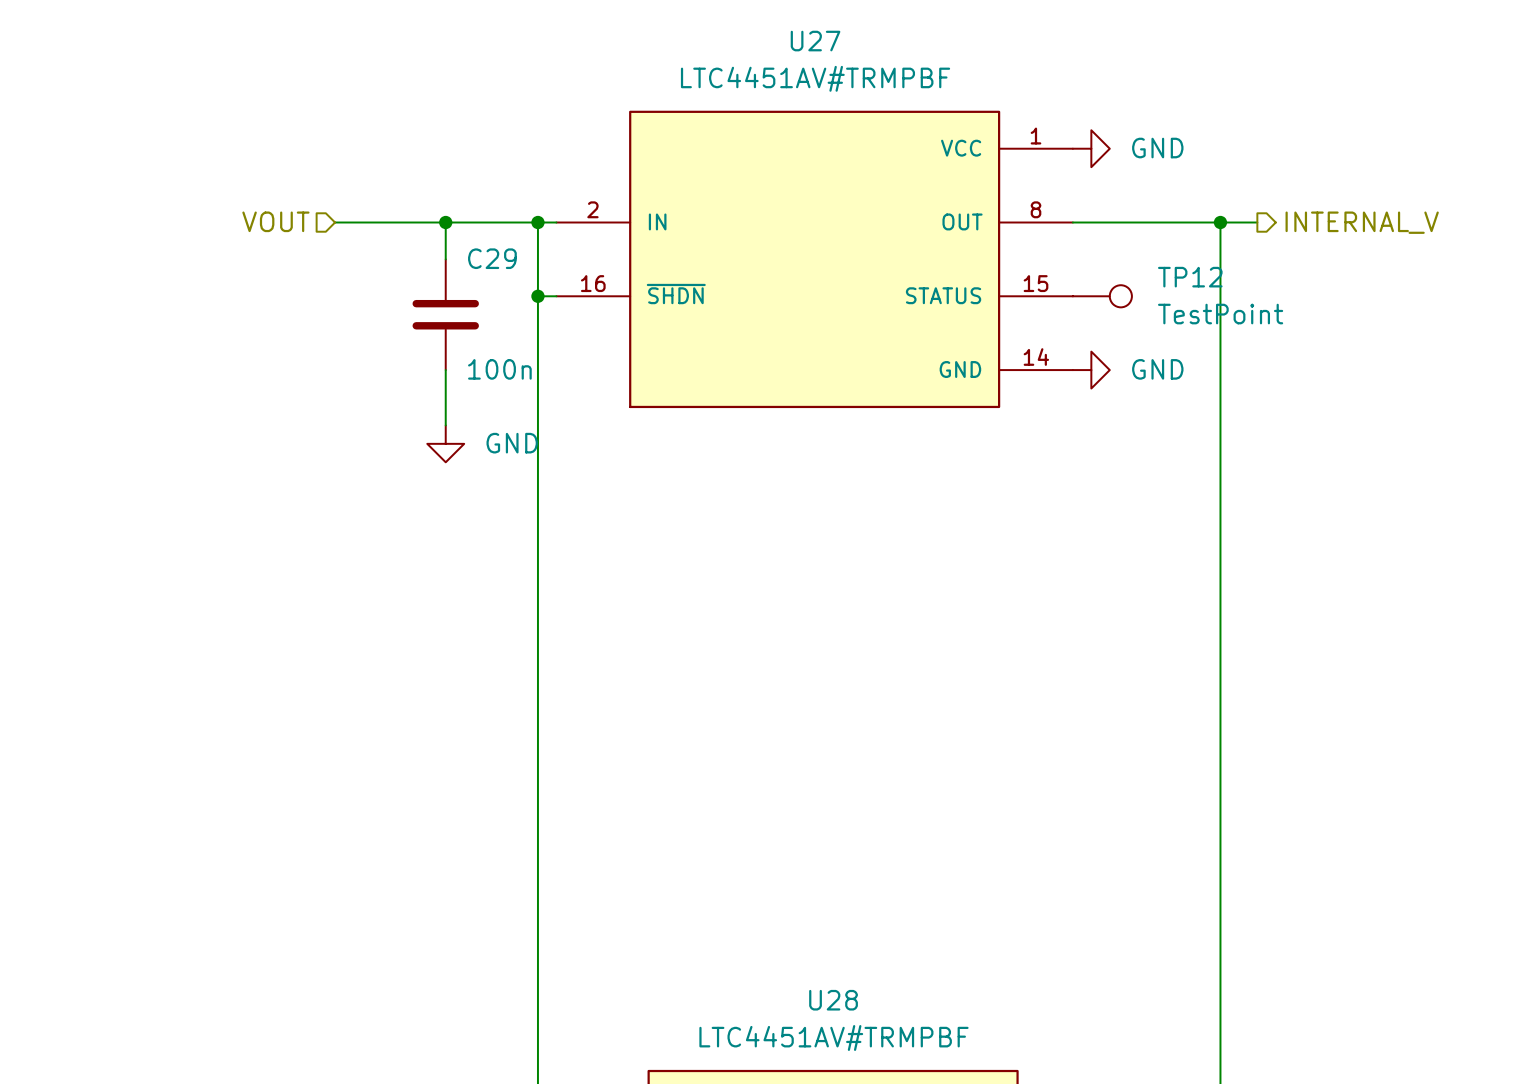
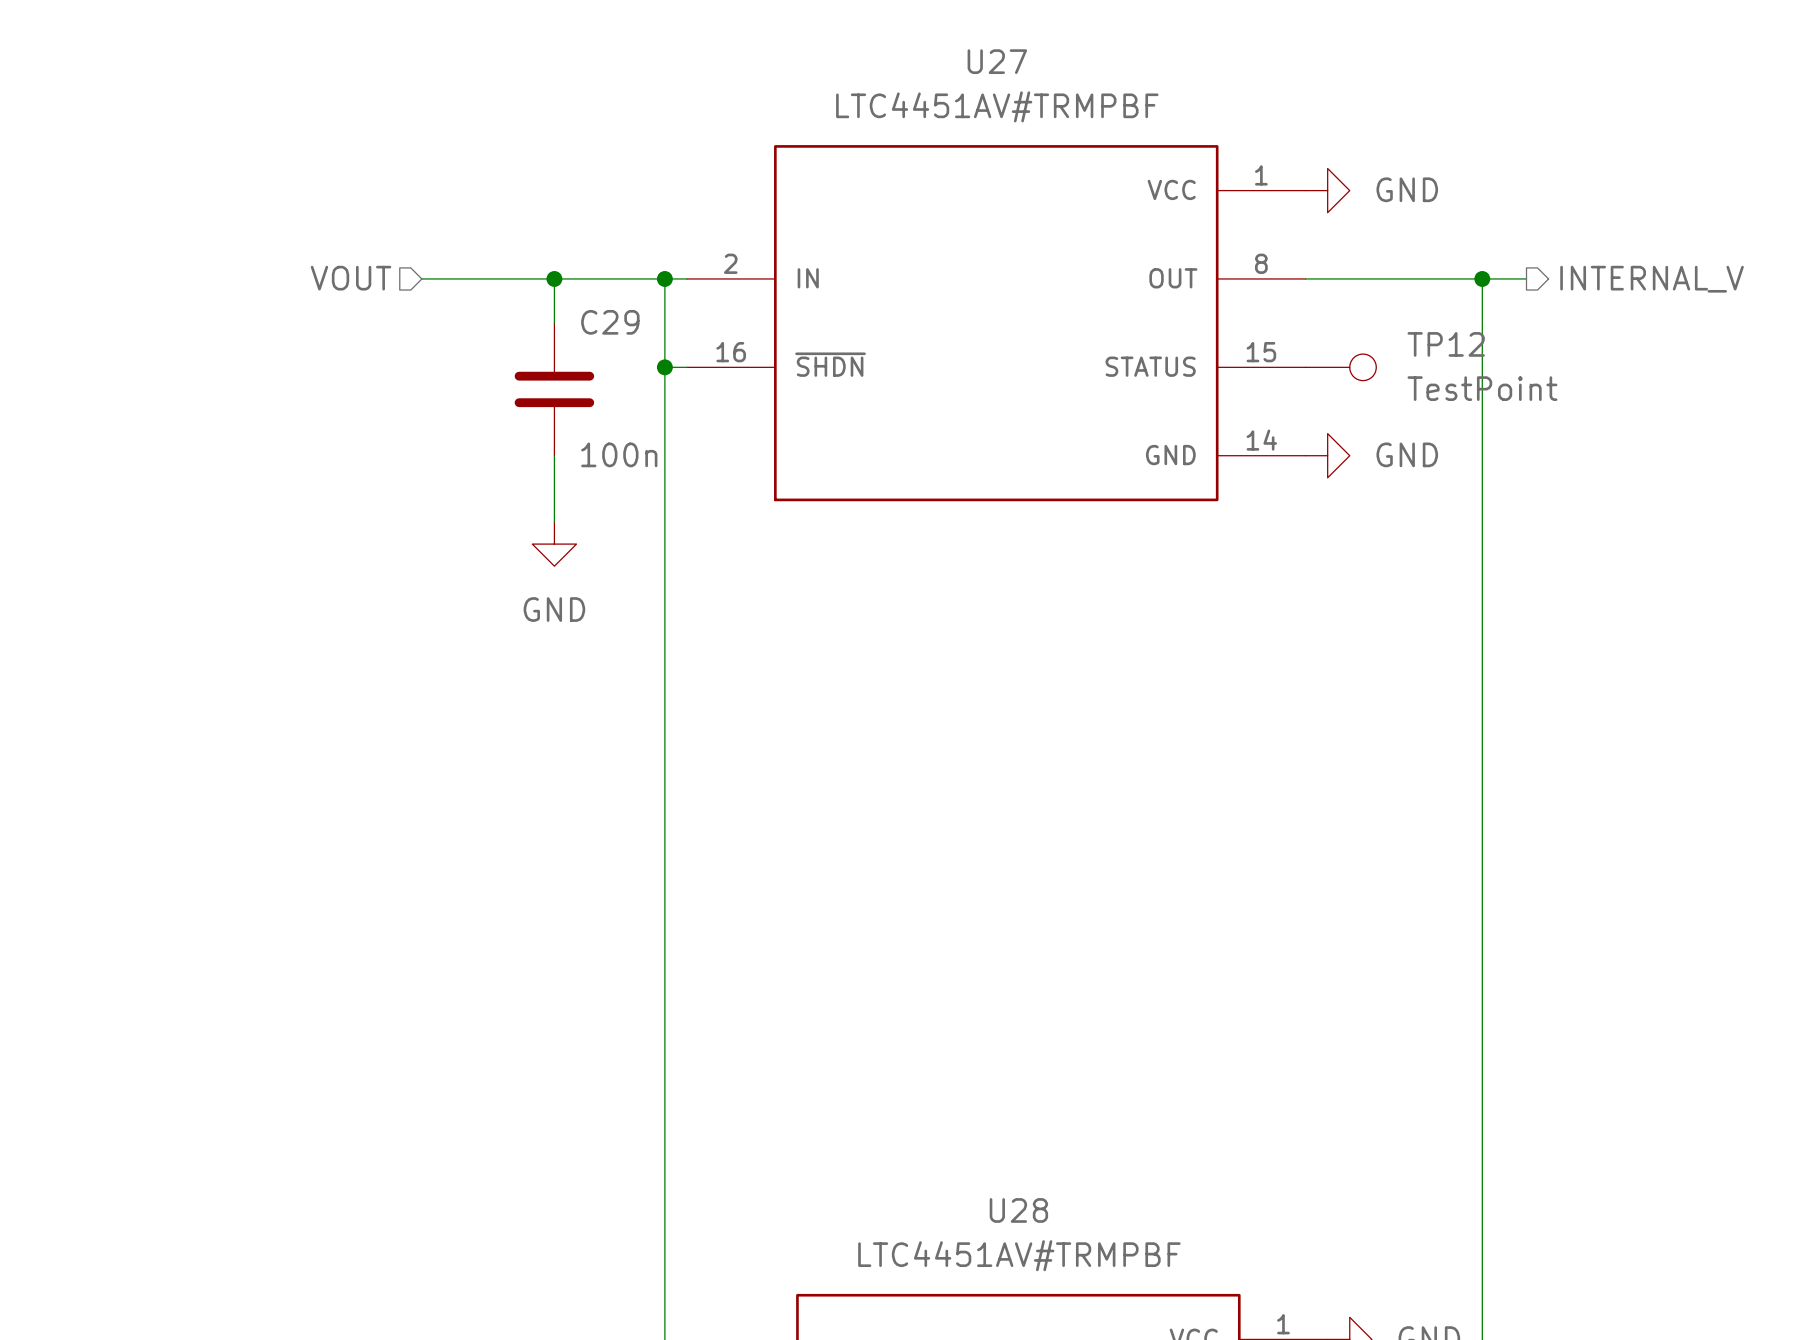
power symbol text position: GND (512, 443) -> GND (554, 609)

